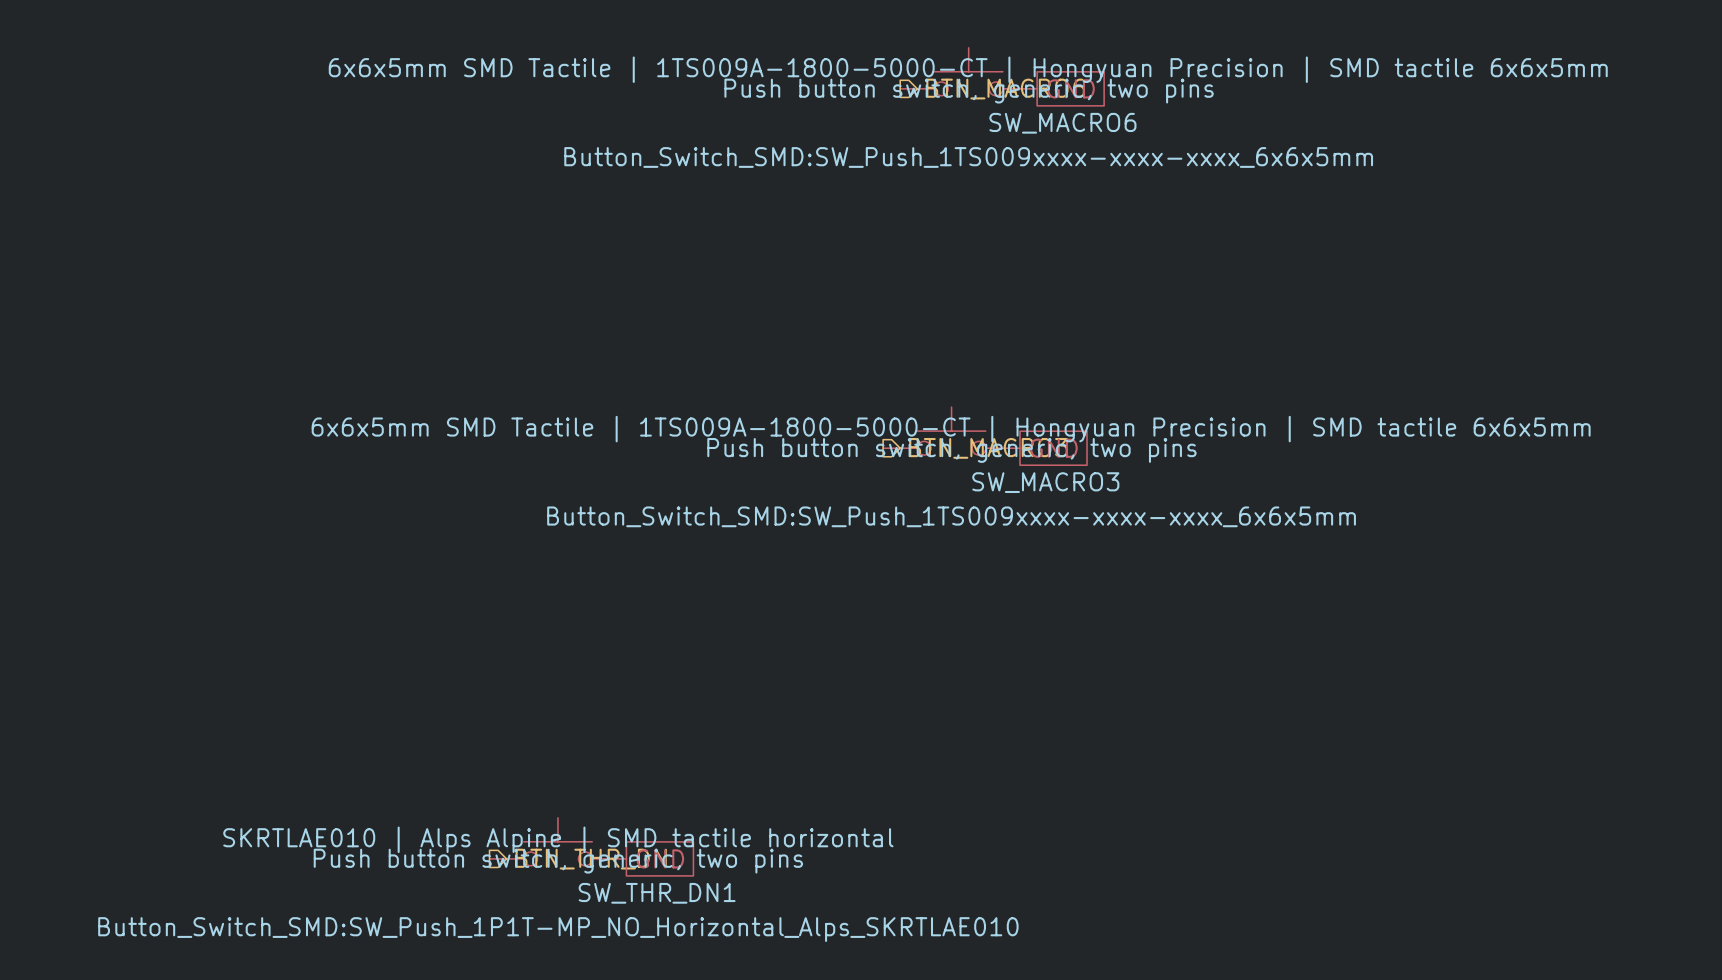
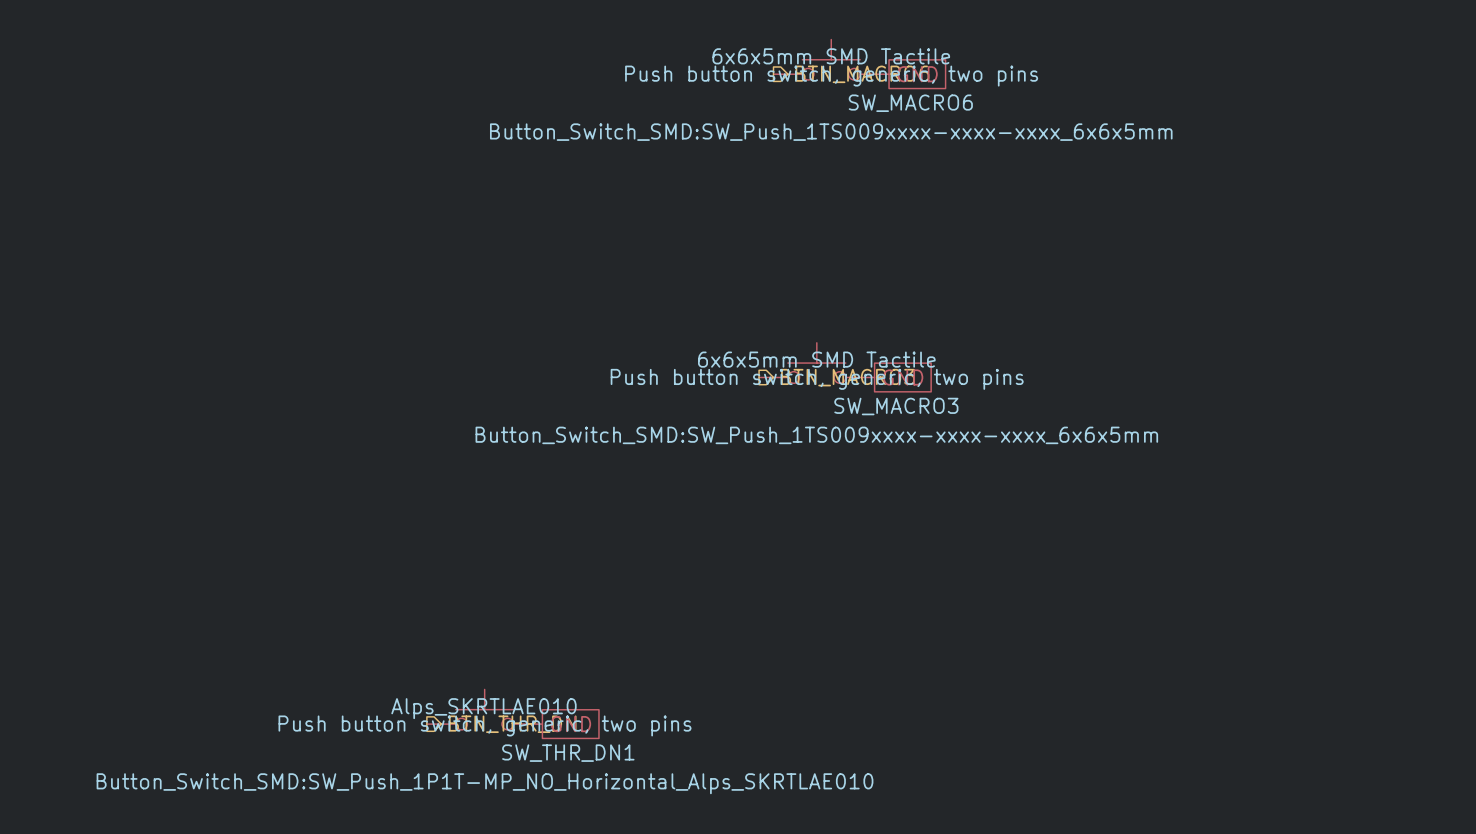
SW_MACRO6 value: 6x6x5mm SMD Tactile | 1TS009A-1800-5000-CT | Hongyuan Precision | SMD tactile 6x6x5mm (968, 69) -> 6x6x5mm SMD Tactile (831, 56)
SW_MACRO3 value: 6x6x5mm SMD Tactile | 1TS009A-1800-5000-CT | Hongyuan Precision | SMD tactile 6x6x5mm (951, 429) -> 6x6x5mm SMD Tactile (816, 359)
SW_THR_DN1 value: SKRTLAE010 | Alps Alpine | SMD tactile horizontal (558, 839) -> Alps_SKRTLAE010 (483, 708)

